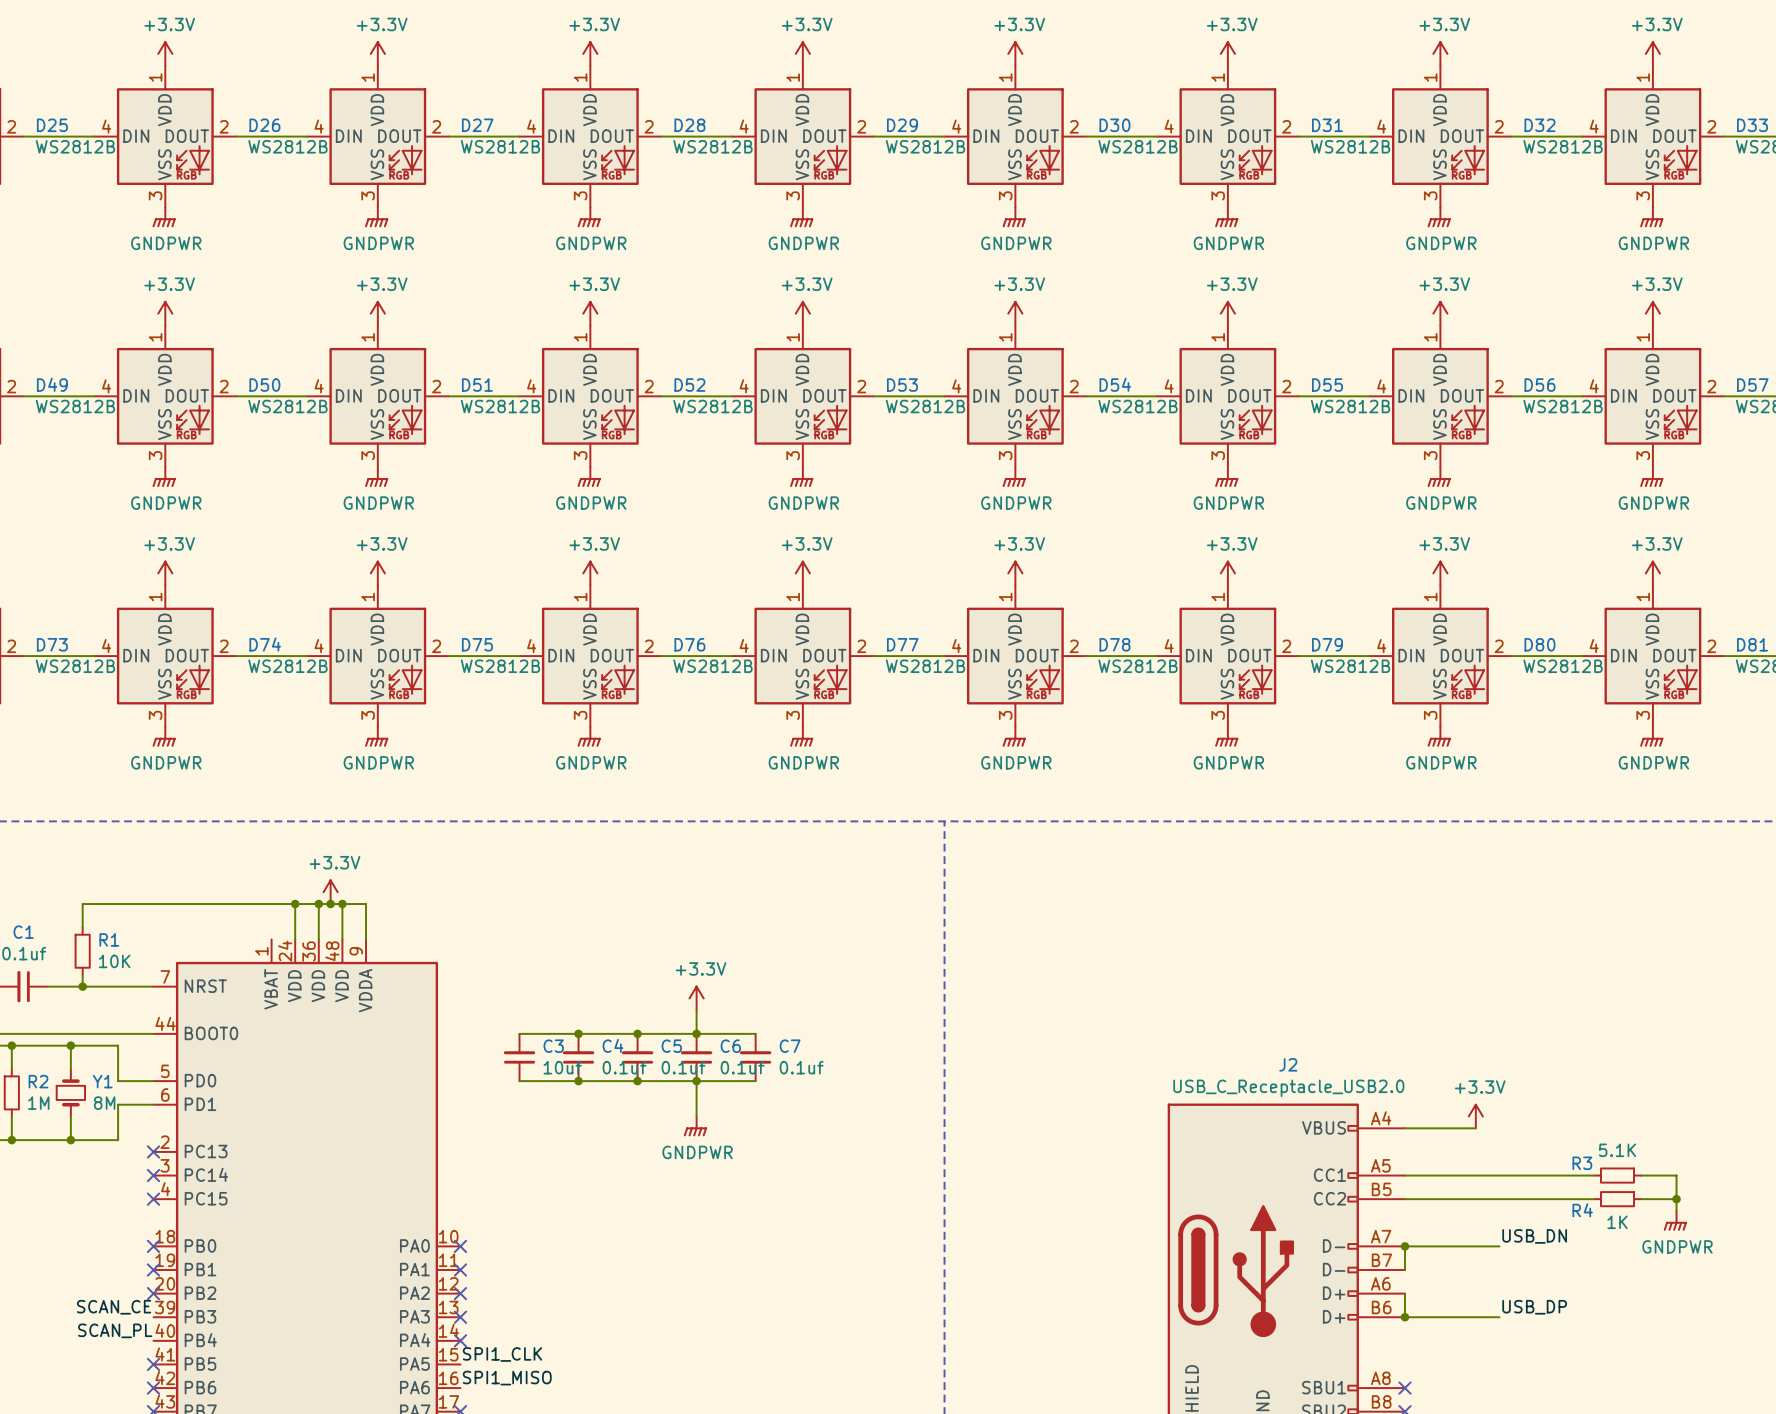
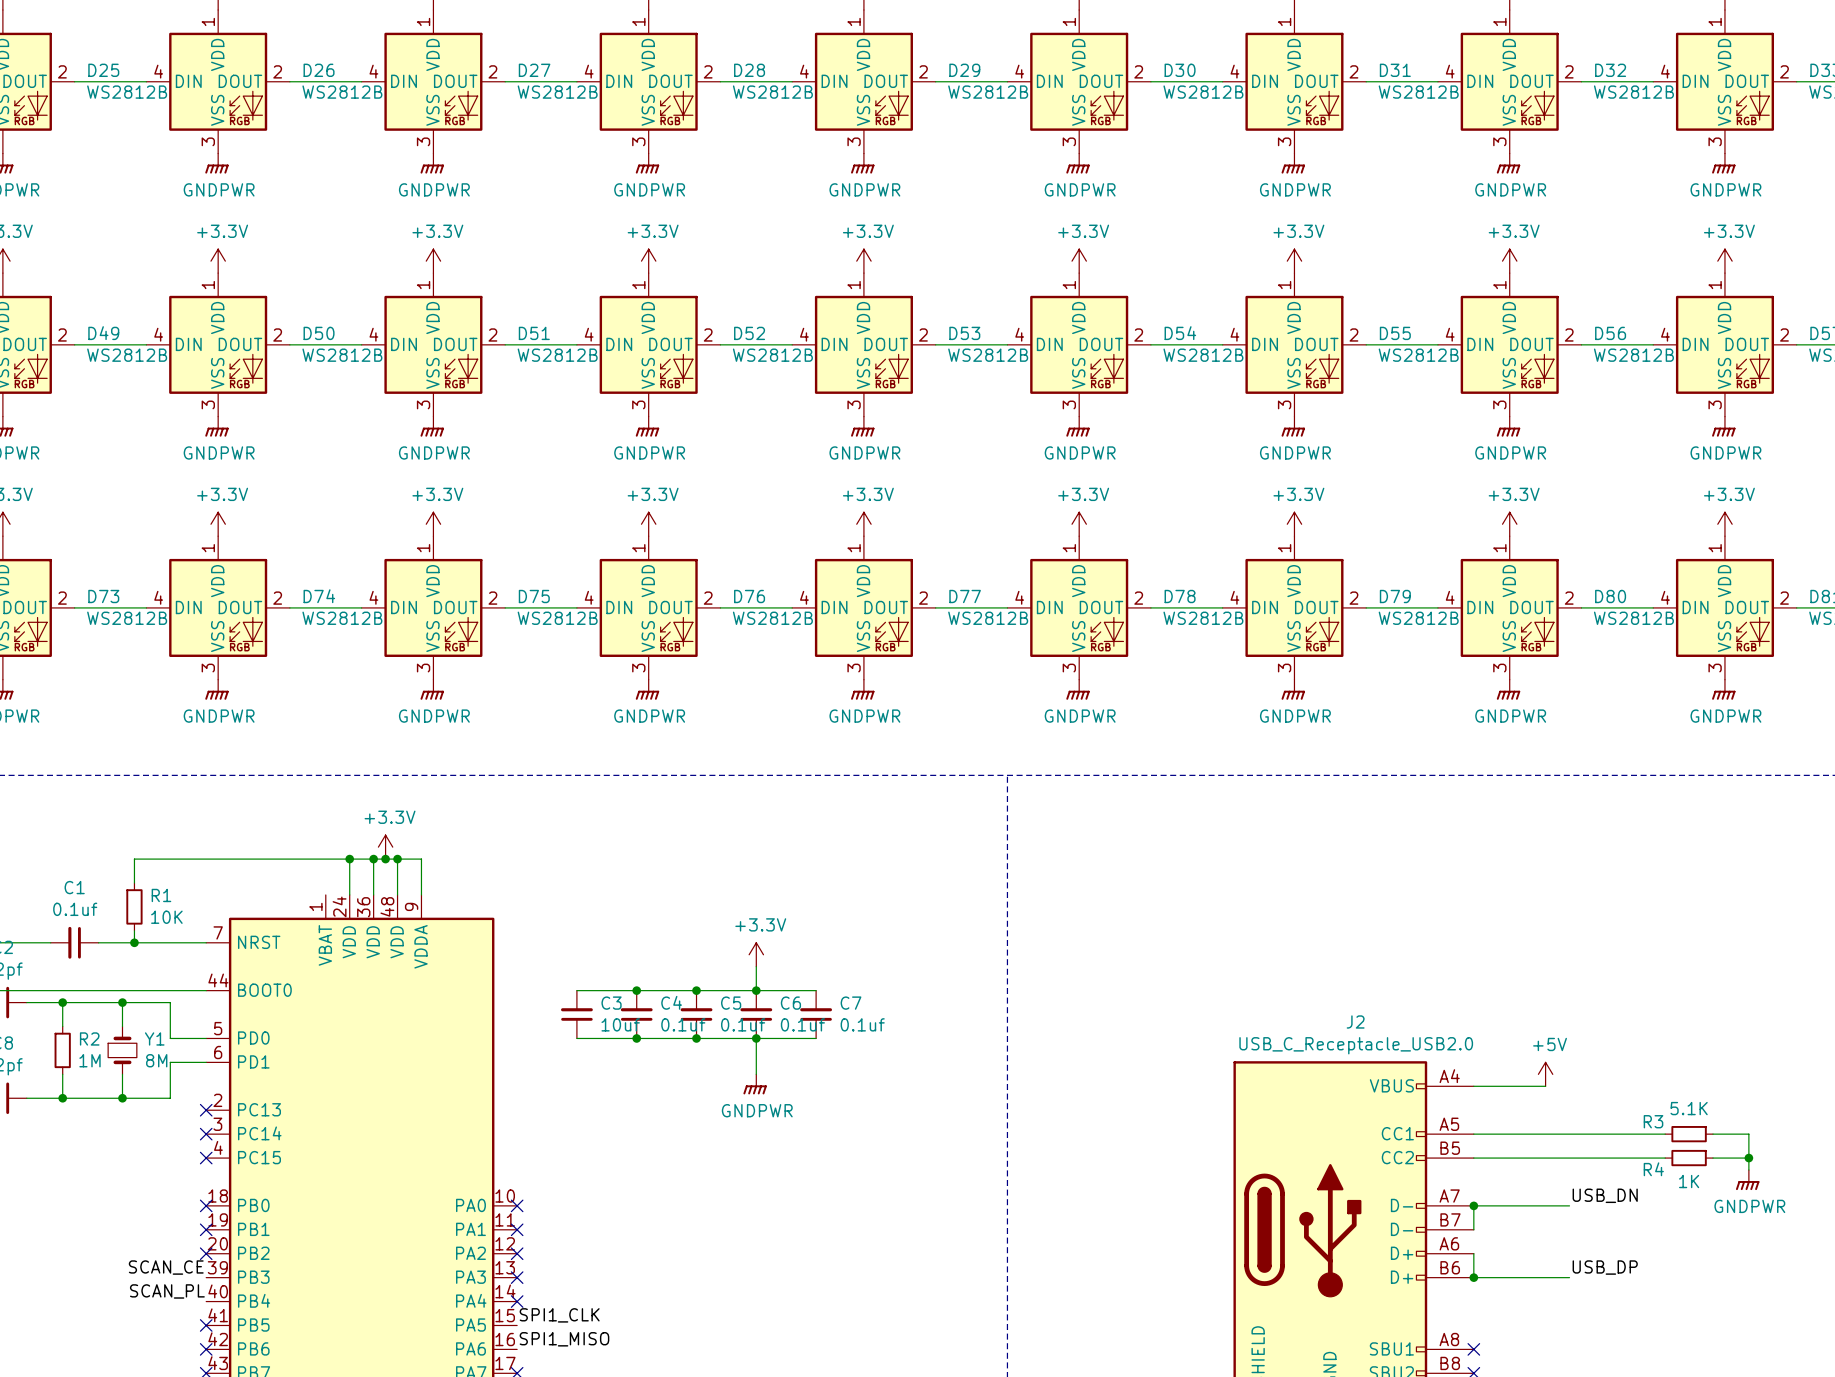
power symbol: +3.3V (1475, 1116) -> +5V (1545, 1074)

